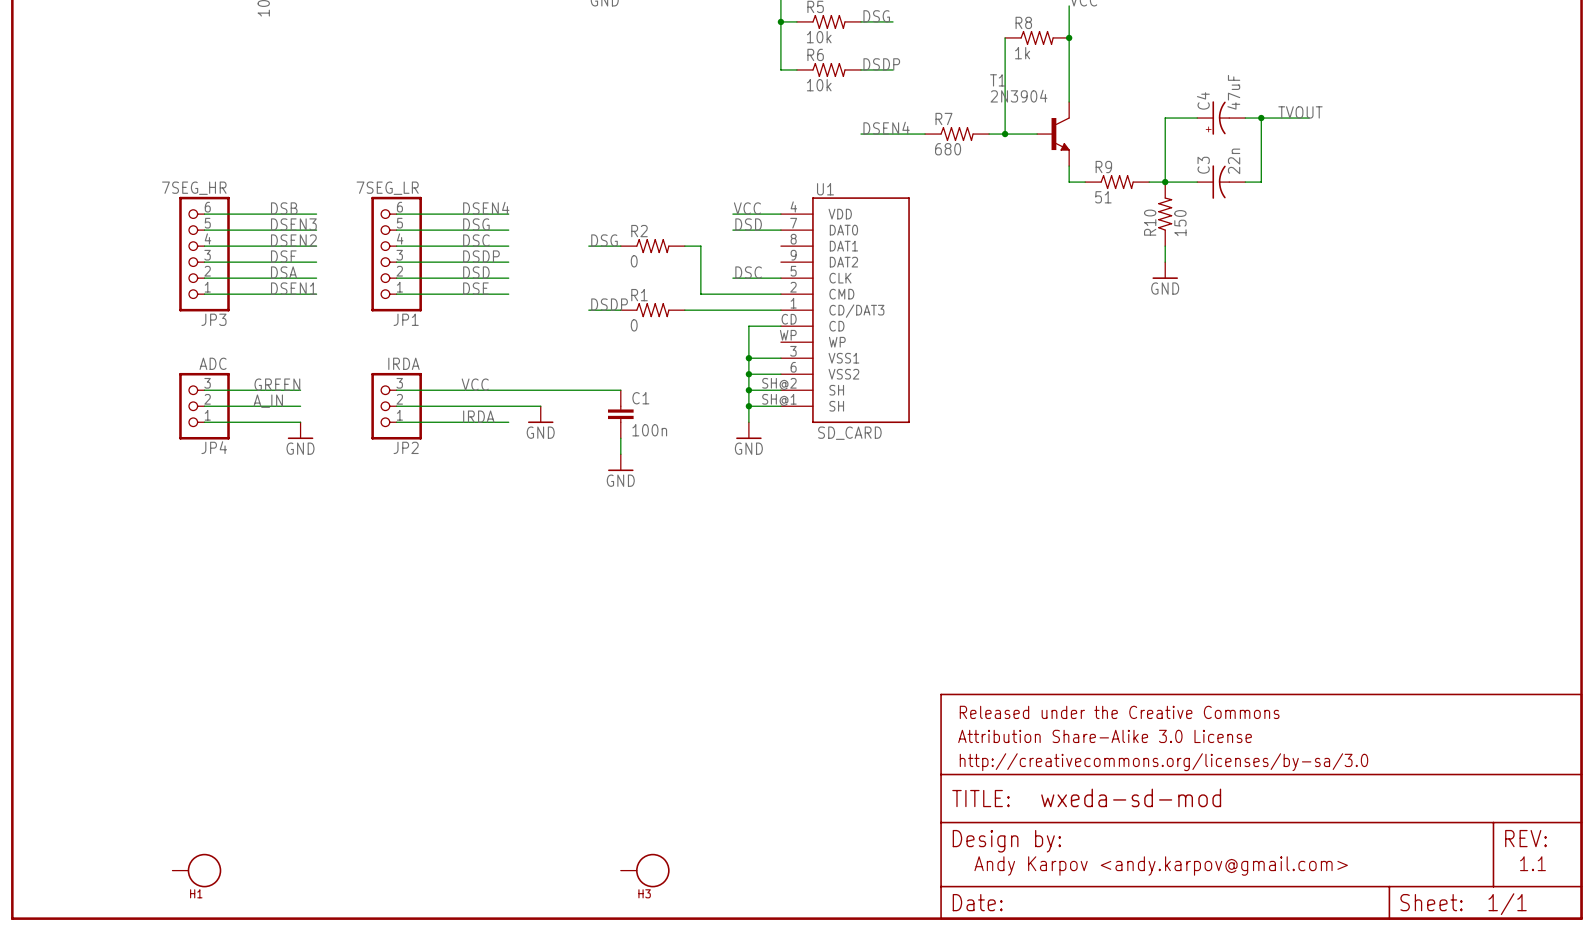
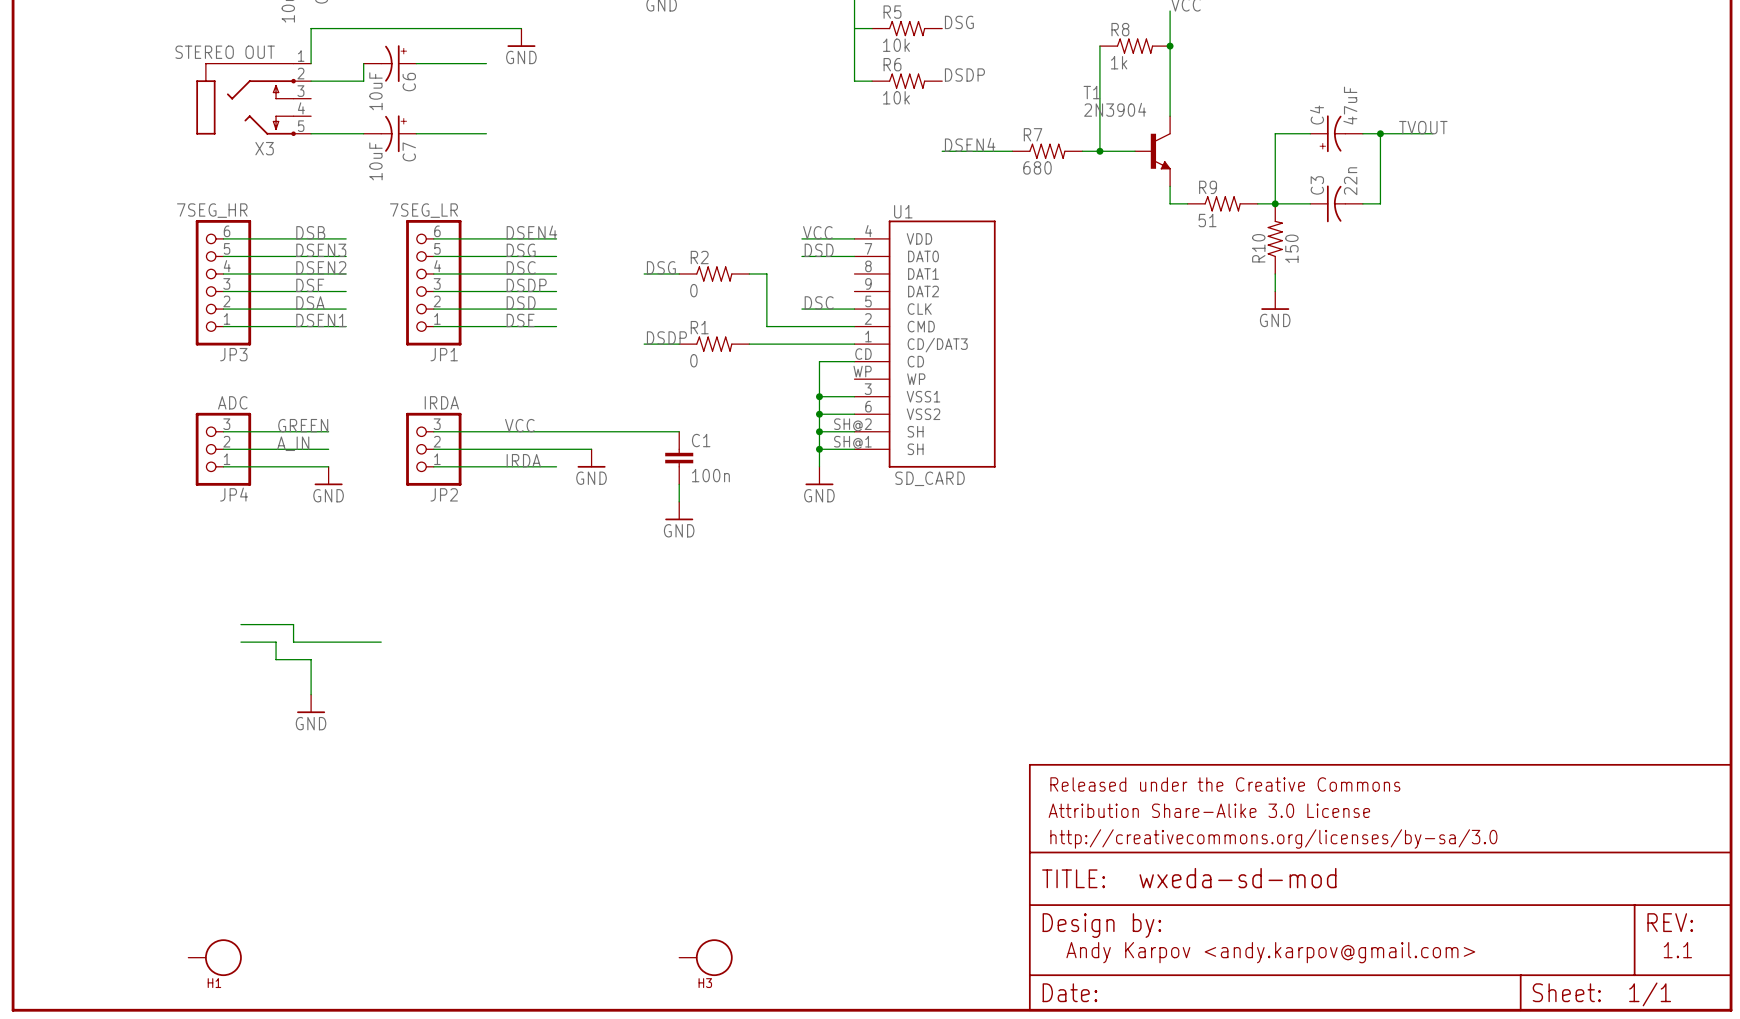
wire: none -> (521, 28) (311, 28) (311, 63)
junction: (780, 21) -> none
wire: (860, 21) (893, 21) -> none
power symbol: none -> GND (521, 37)
wire: none -> (363, 63) (363, 81) (311, 81)
C6: none -> 10uF (389, 63)
wire: none -> (416, 63) (486, 63)
wire: (860, 69) (893, 69) -> none
X3: none -> STEREO OUT (253, 99)
wire: none -> (311, 133) (363, 133)
C7: none -> 10uF (389, 133)
wire: none -> (416, 133) (486, 133)
wire: none -> (240, 624) (293, 624) (293, 642) (381, 642)
wire: none -> (240, 642) (276, 642) (276, 659) (311, 659) (311, 694)
power symbol: none -> GND (311, 703)

